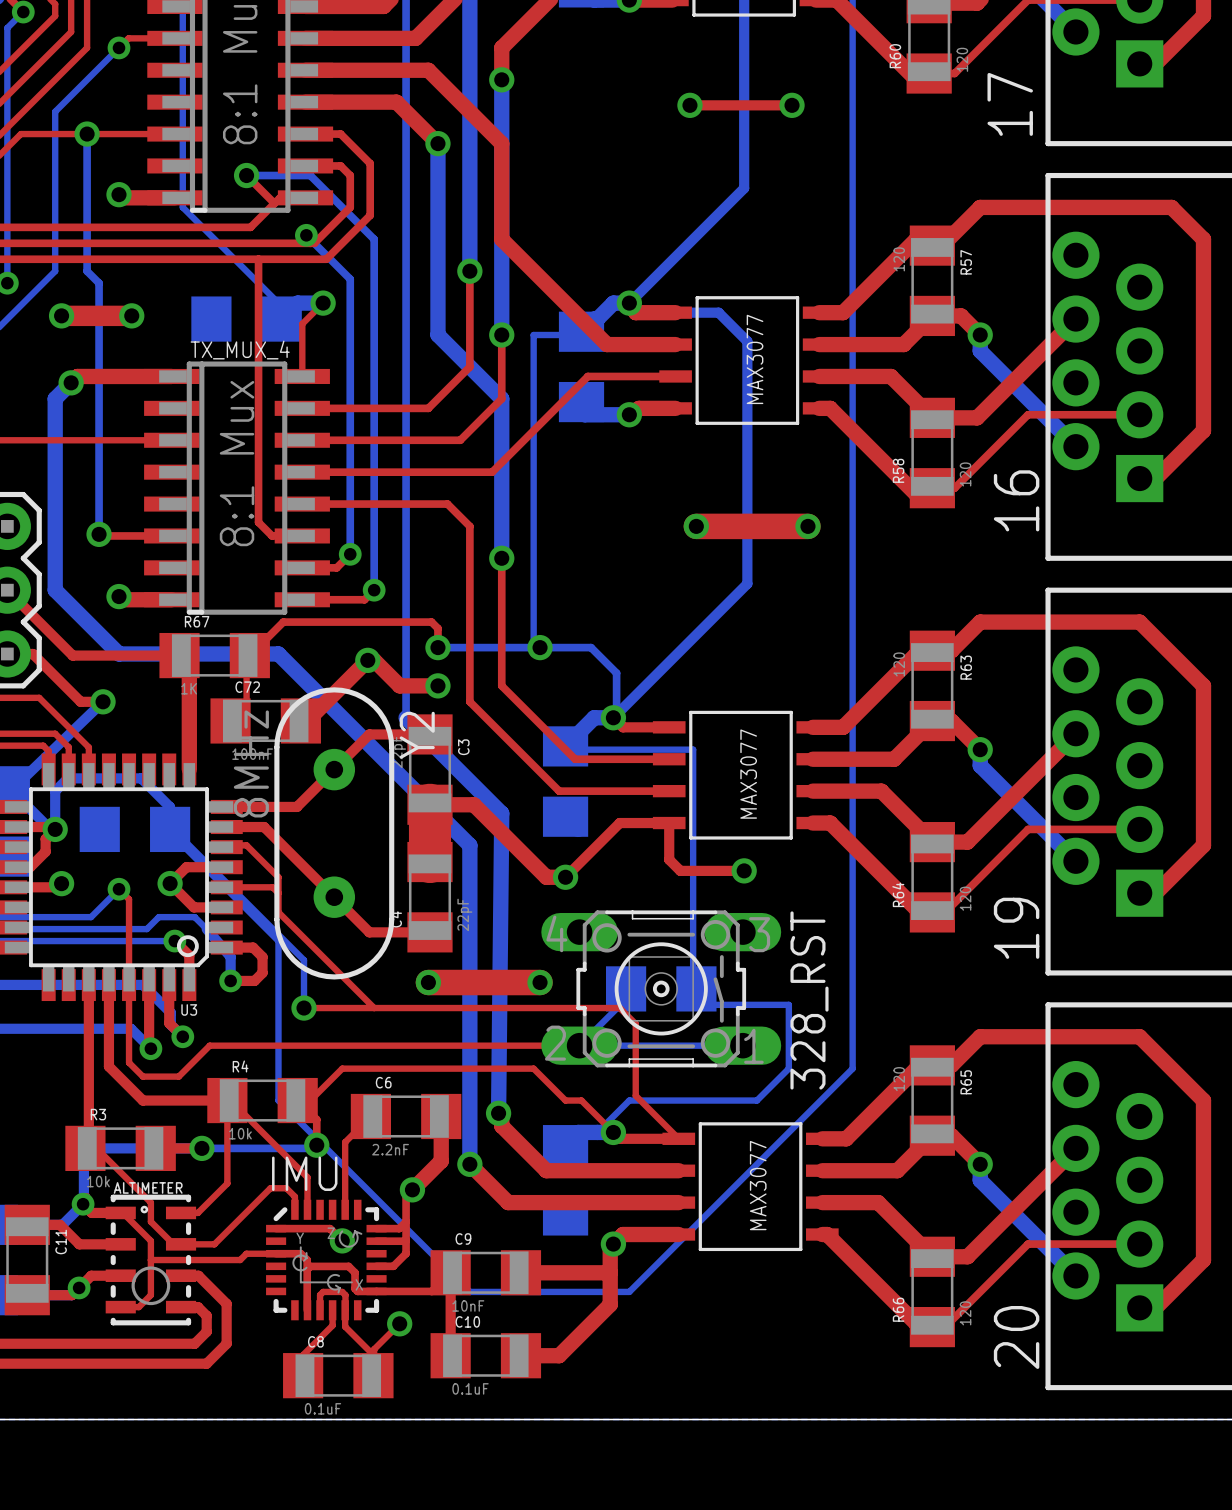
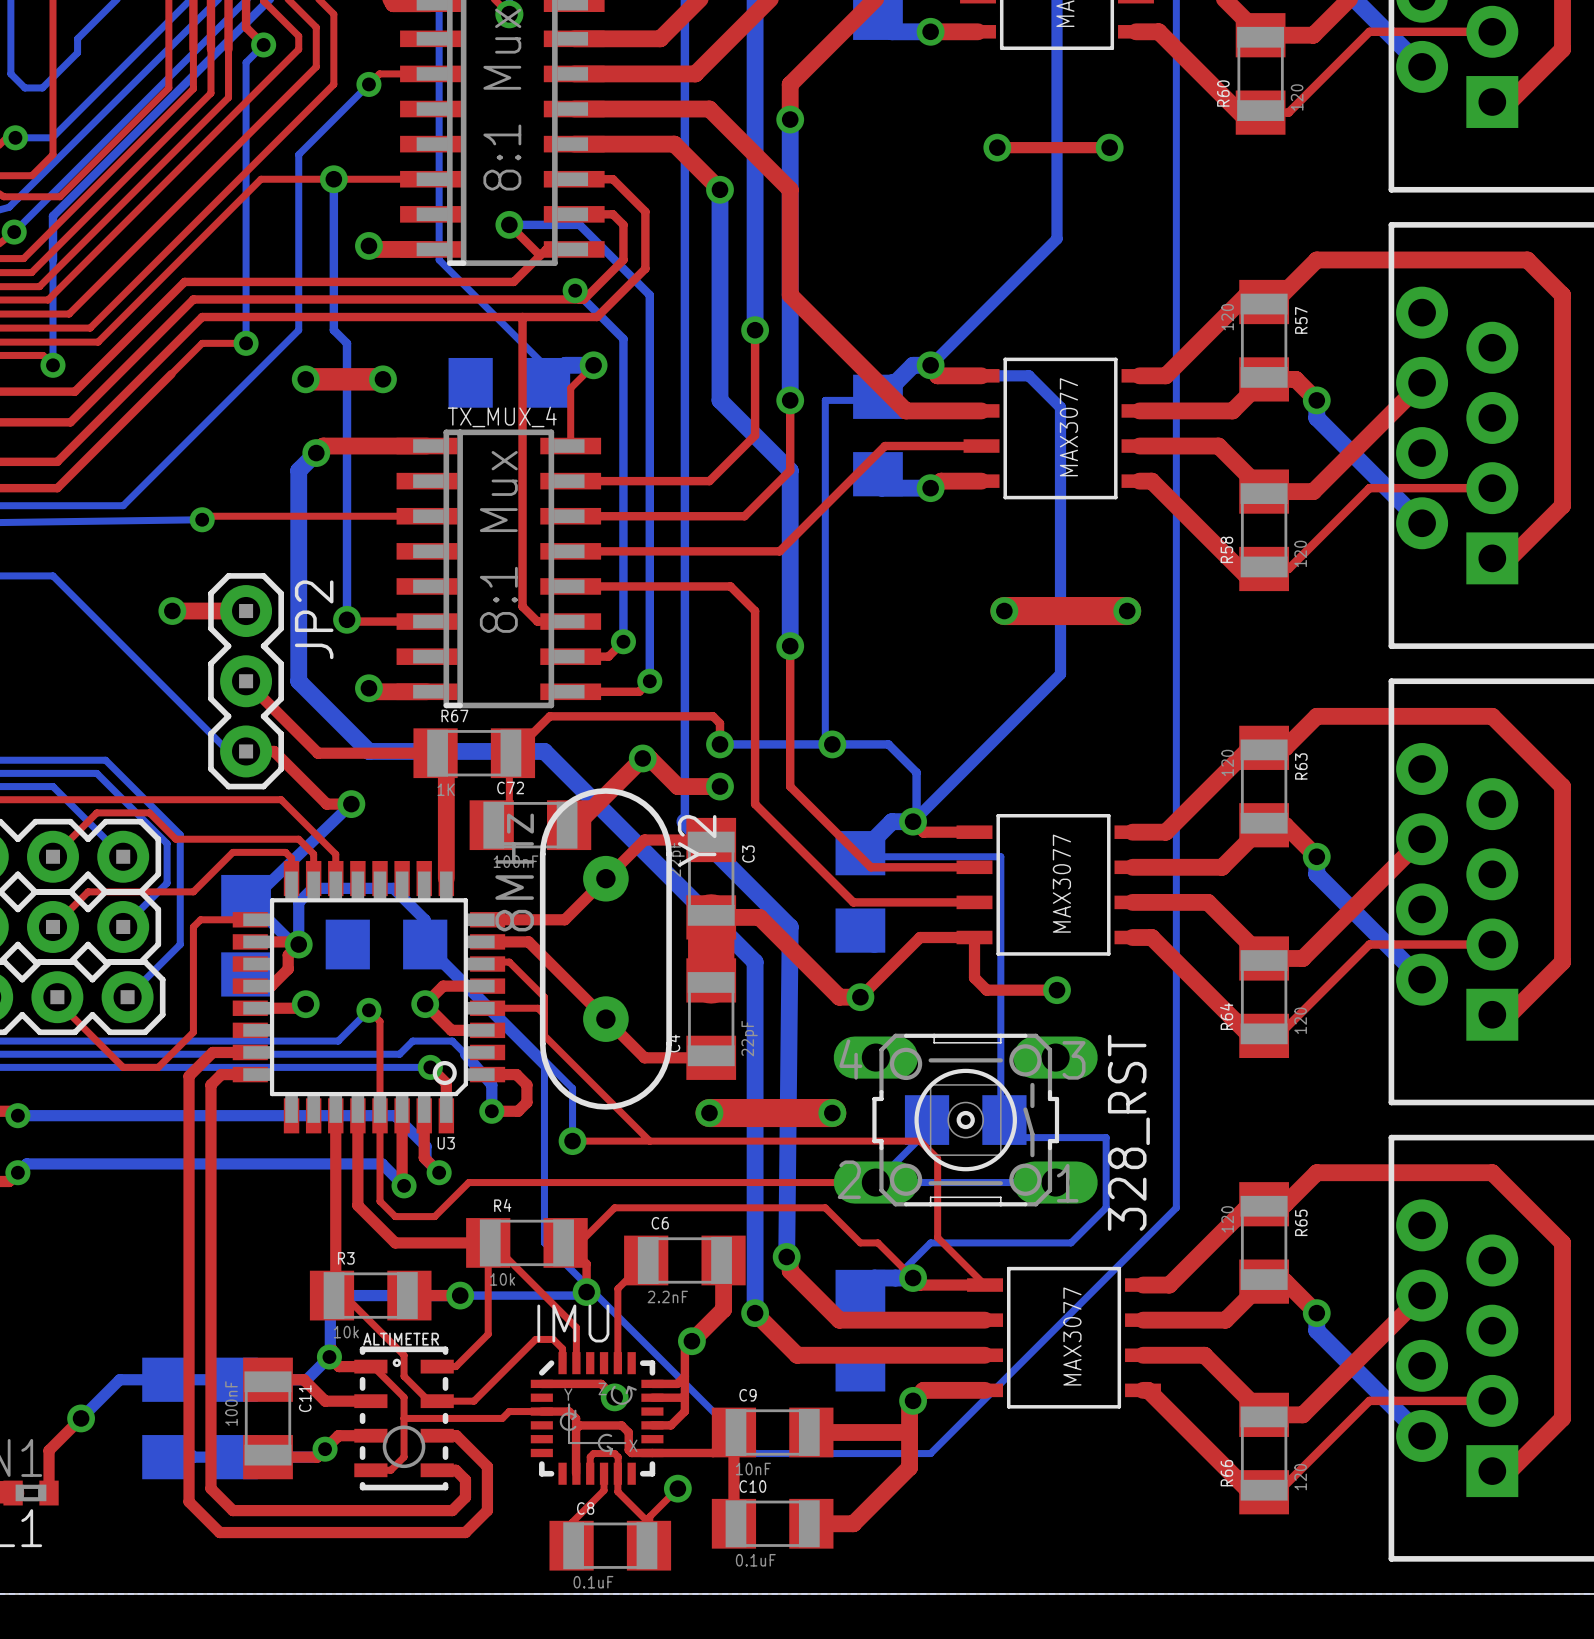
text: 17 (1010, 104) -> none
text: 16 (1016, 500) -> none
JP2 name: none -> JP2 (314, 619)
text: 19 (1016, 928) -> none
text: 20 (1016, 1337) -> none

